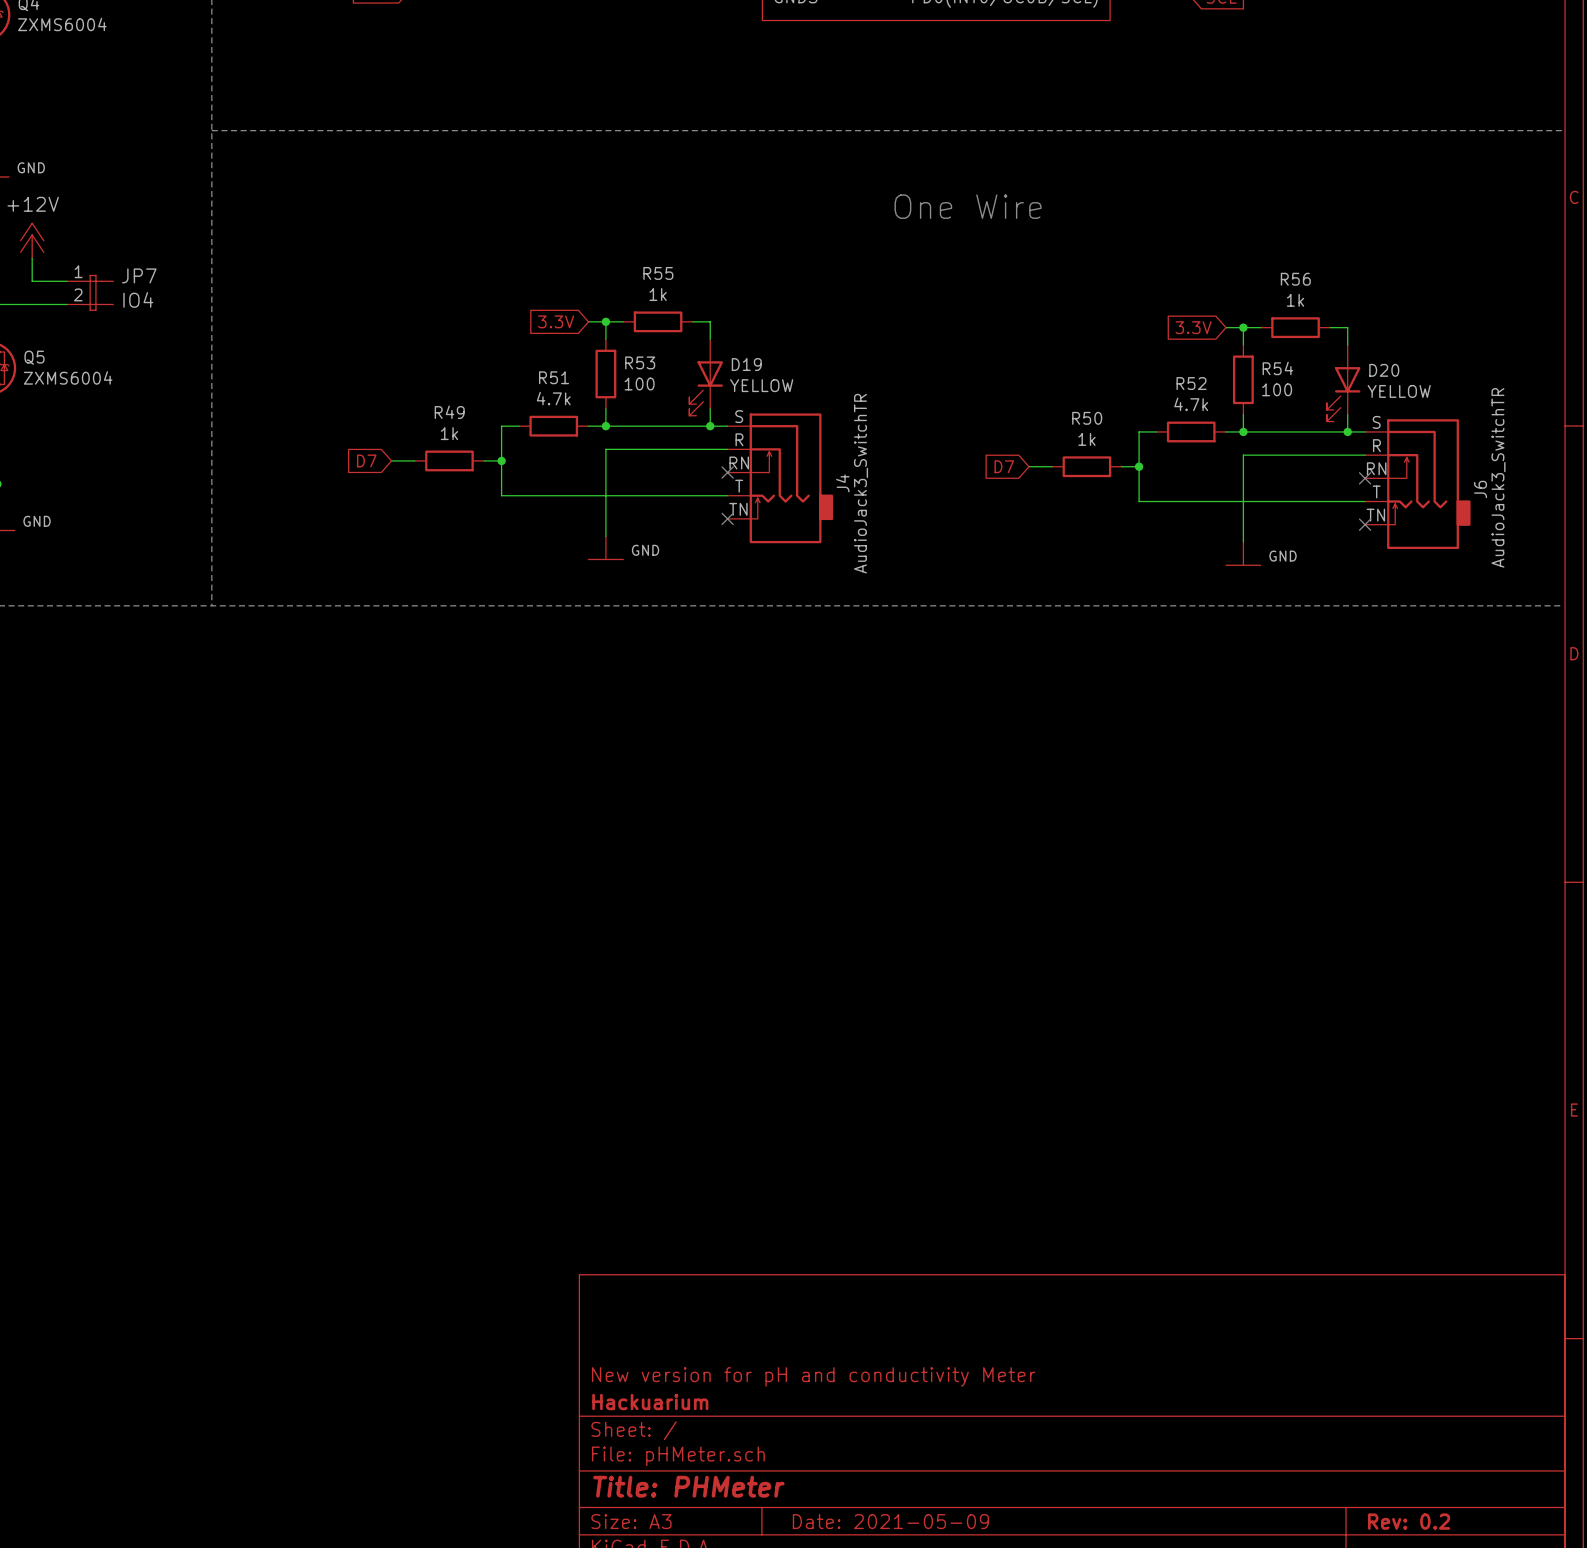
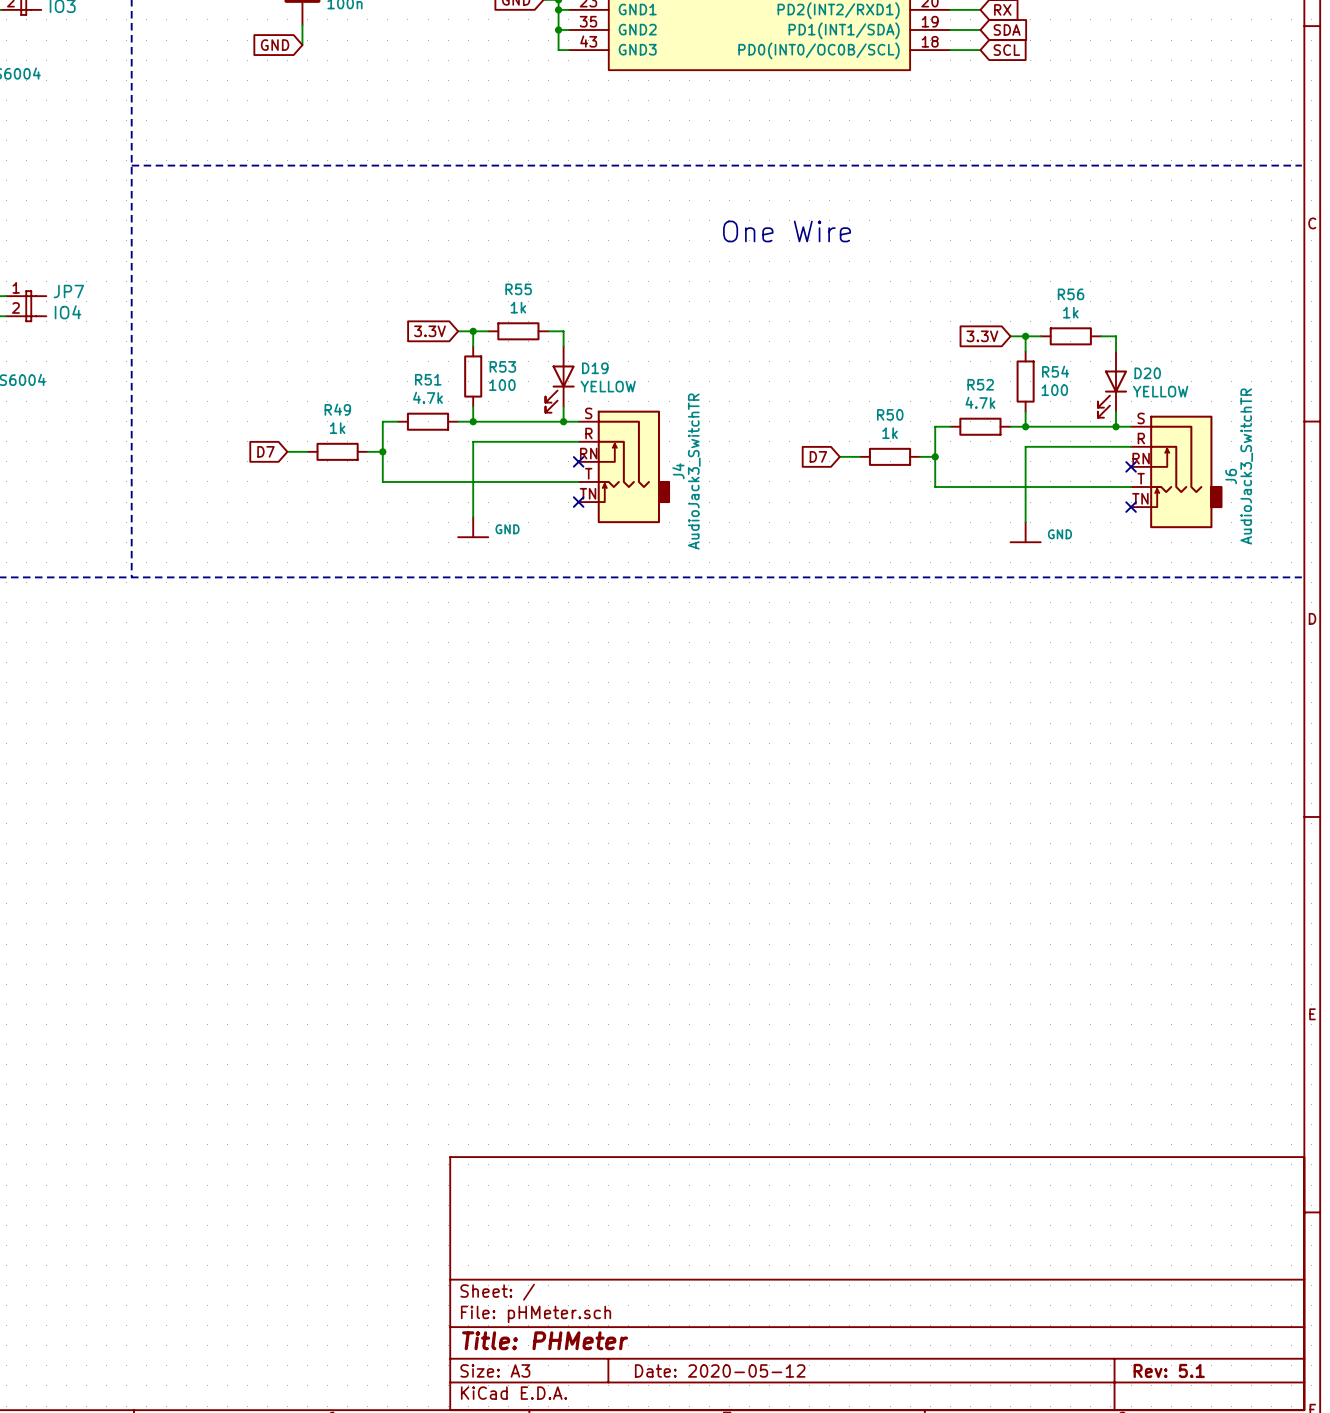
title block: New version for pH and conductivity Meter (813, 1376) -> none
title block: Hackuarium (650, 1402) -> none
title block: Date: 2021-05-09 (890, 1521) -> Date: 2020-05-12 (720, 1370)
title block: Rev: 0.2 (1409, 1521) -> Rev: 5.1 (1169, 1370)

